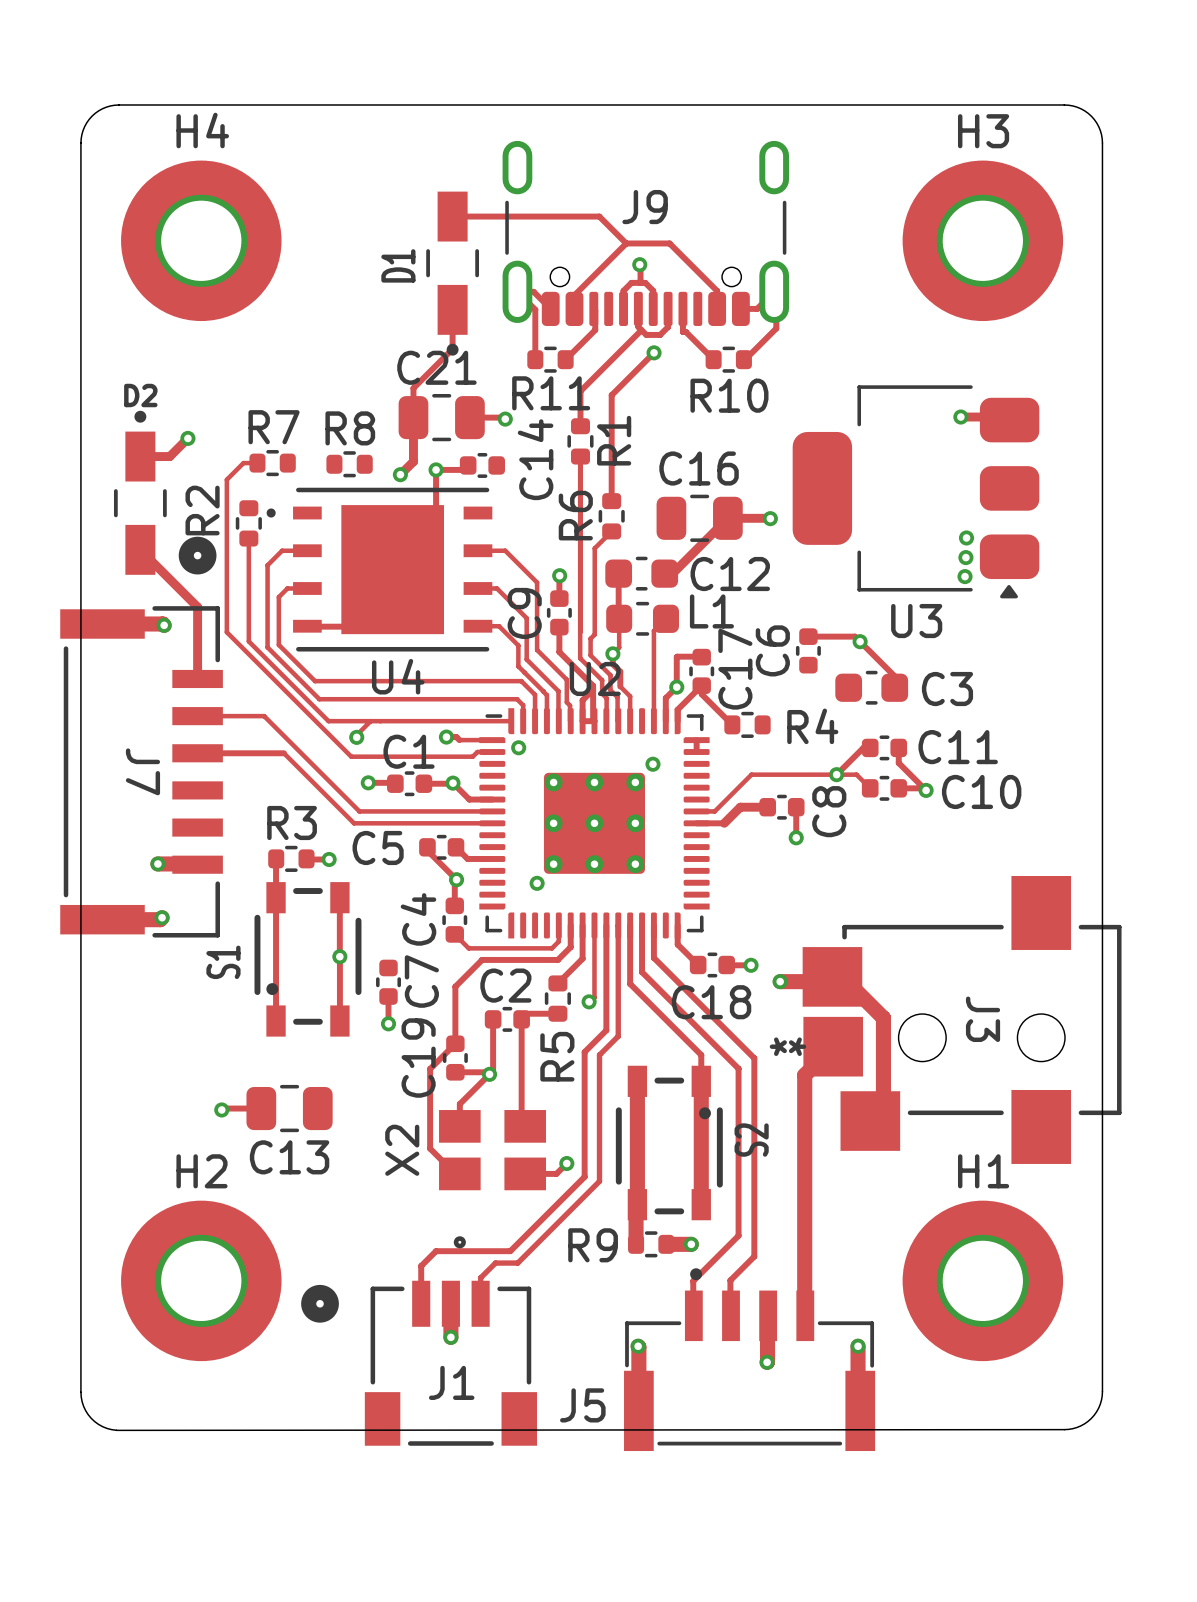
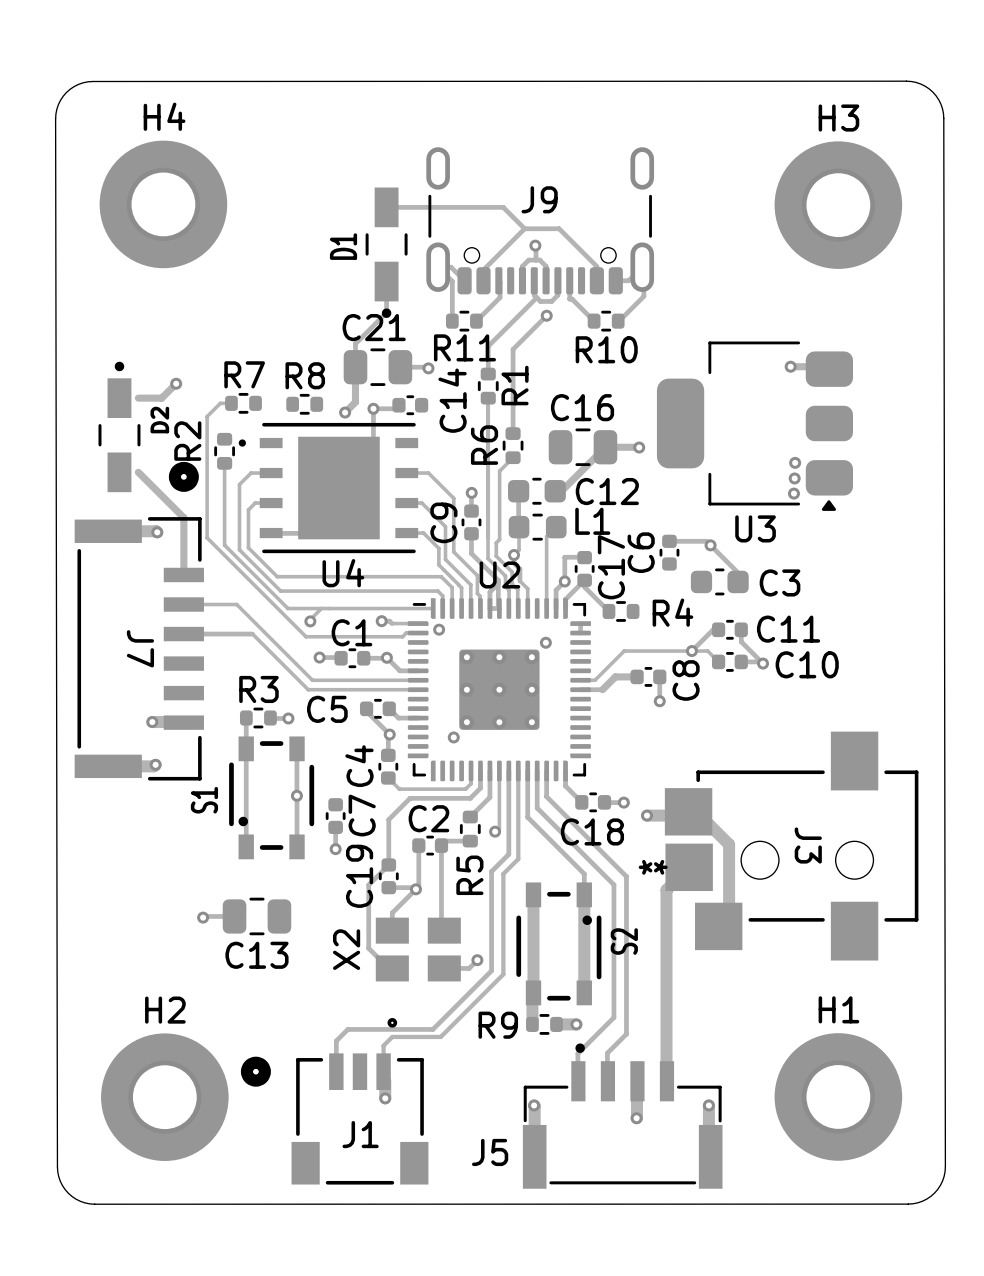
board edge: (119, 104) (1064, 104) (1080, 108) (1094, 119) (1100, 130) (1102, 143) (1102, 1391) (1098, 1408) (1088, 1421) (1076, 1427) (1064, 1429) (116, 1430) (98, 1424) (88, 1414) (83, 1406) (80, 1392) (80, 143) (84, 126) (92, 116) (102, 108) (119, 104) -> (945, 1166) (943, 118) (942, 108) (936, 95) (925, 86) (906, 81) (92, 81) (83, 82) (70, 89) (60, 100) (55, 118) (57, 1167) (60, 1181) (65, 1189) (76, 1199) (94, 1204) (908, 1204) (922, 1201) (934, 1193) (942, 1181) (945, 1166)
H4 position: (201, 240) -> (163, 204)
H3 position: (982, 240) -> (838, 205)
D2 name rotation: 0° (140, 395) -> 90° counterclockwise (159, 420)
D2 name position: D2 (140, 395) -> D2 (159, 420)
D2 position: (140, 492) -> (119, 426)
track: (510, 1250) (436, 1251) (421, 1266) (421, 1303) -> (432, 1029) (347, 1029) (336, 1040) (336, 1071)
track: (520, 1260) (517, 1263) (495, 1263) (480, 1277) (480, 1303) -> (440, 1036) (392, 1036) (383, 1045) (383, 1071)
H2 position: (201, 1280) -> (164, 1097)
H1 position: (982, 1280) -> (838, 1096)
J1 position: (419, 1363) -> (334, 1118)

